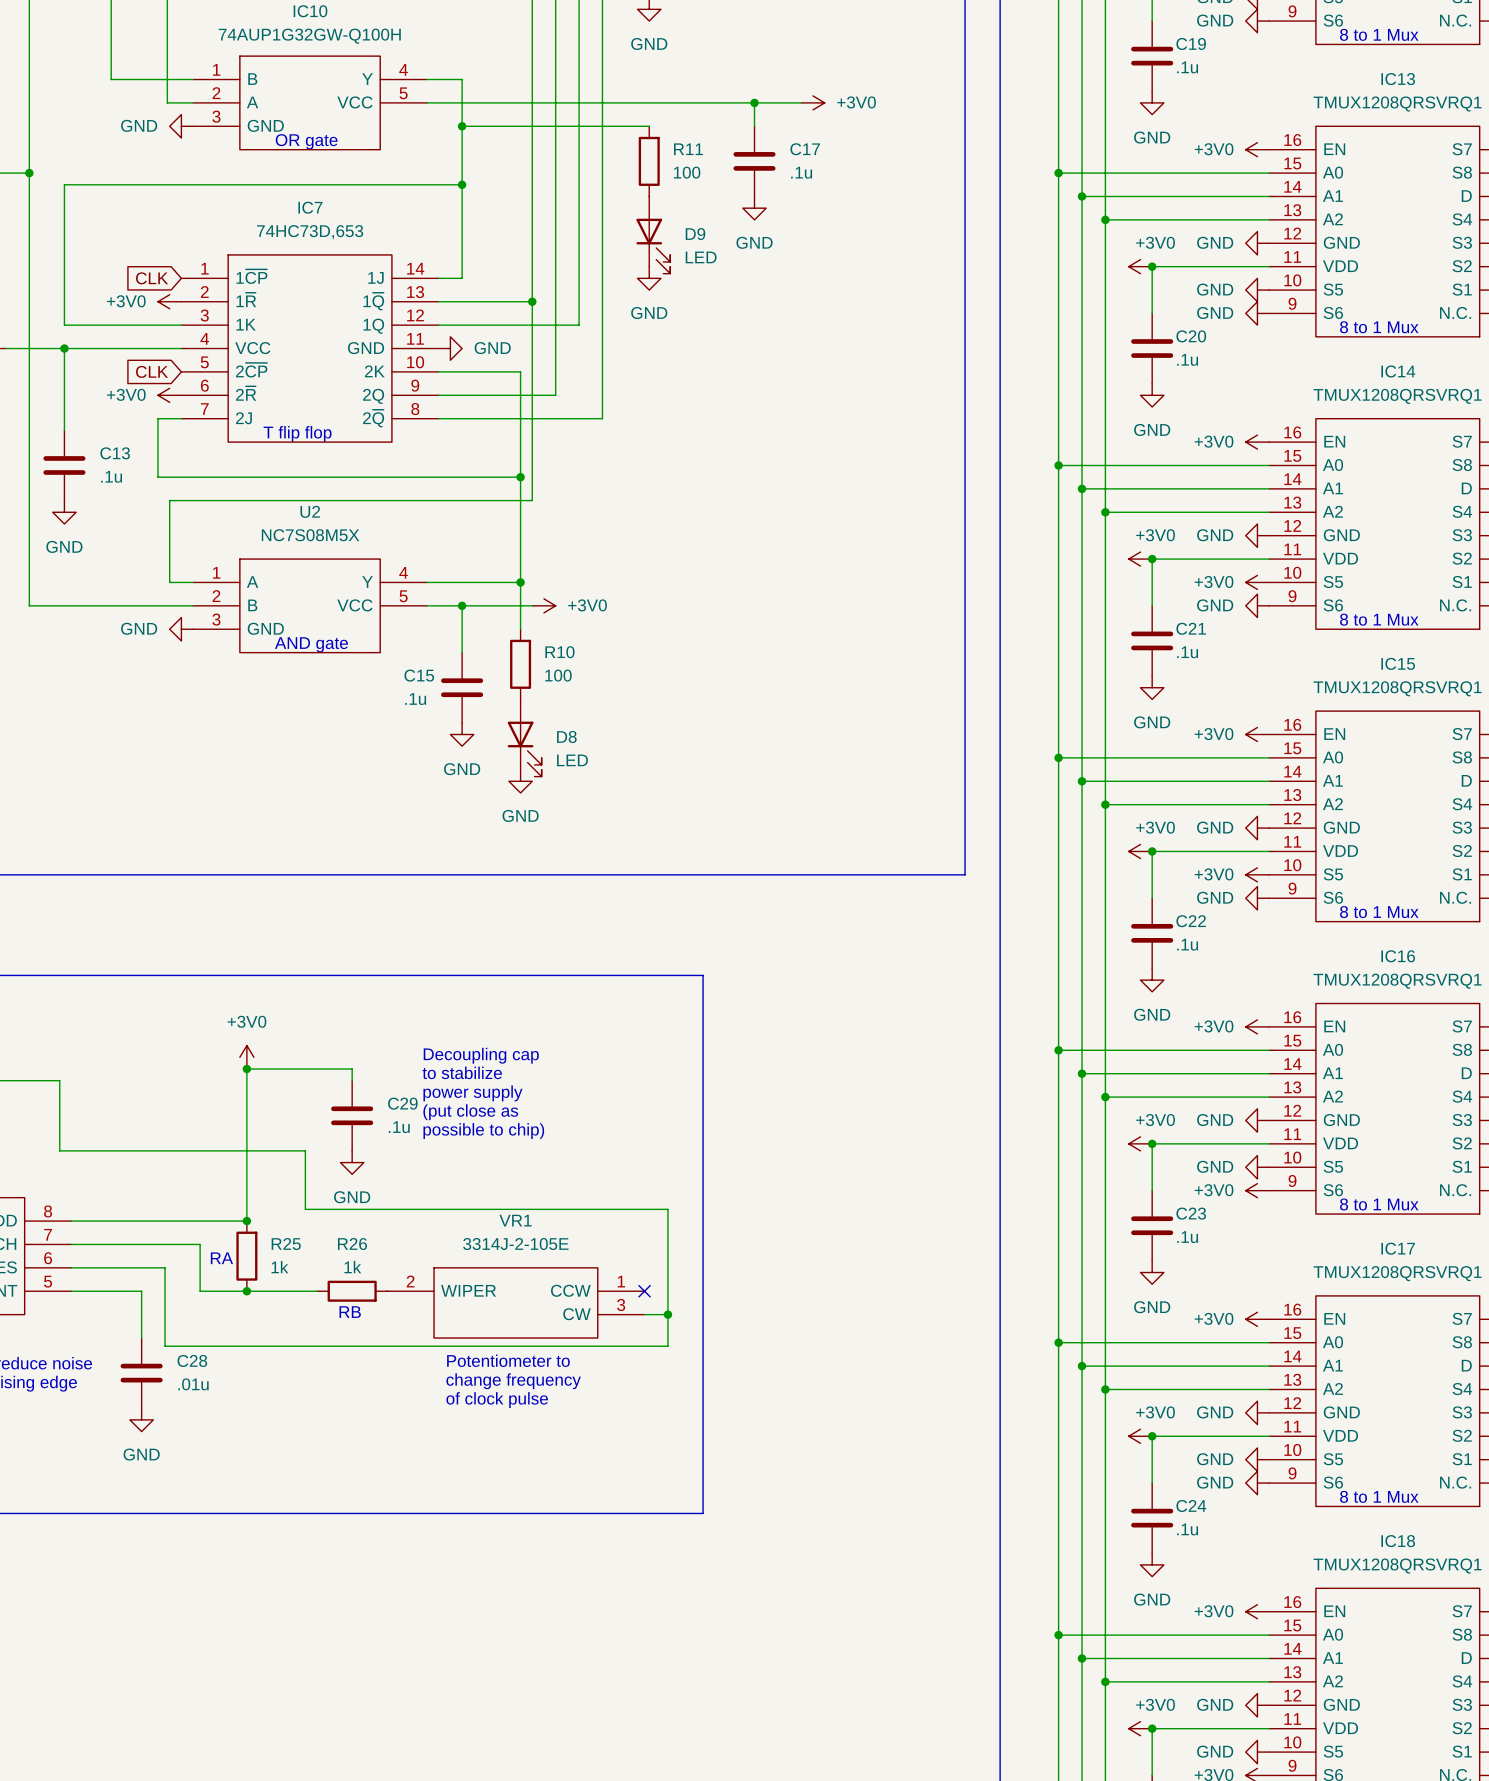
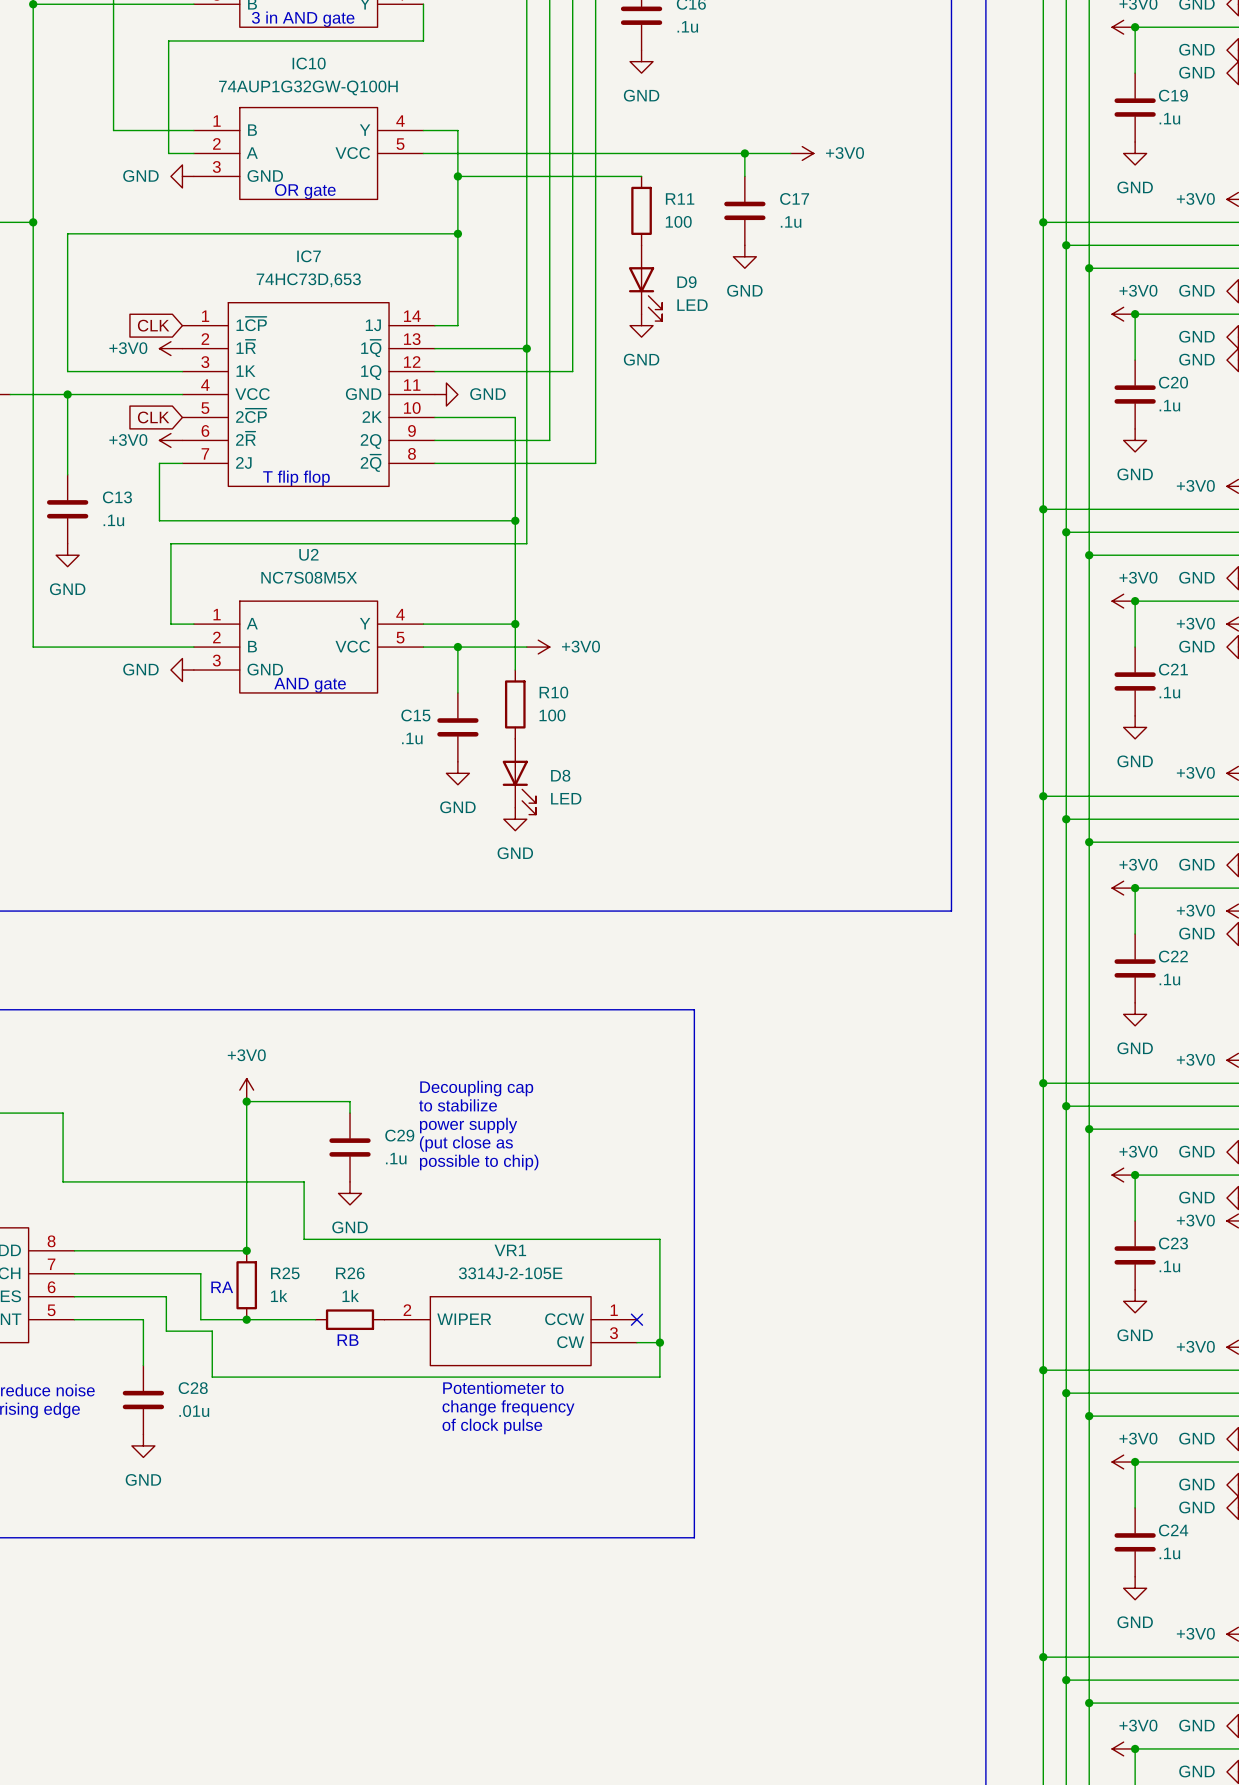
wire: (165, 1302) (165, 1346) (667, 1346) -> (166, 1331) (212, 1331) (212, 1377) (659, 1377) (659, 1373)

